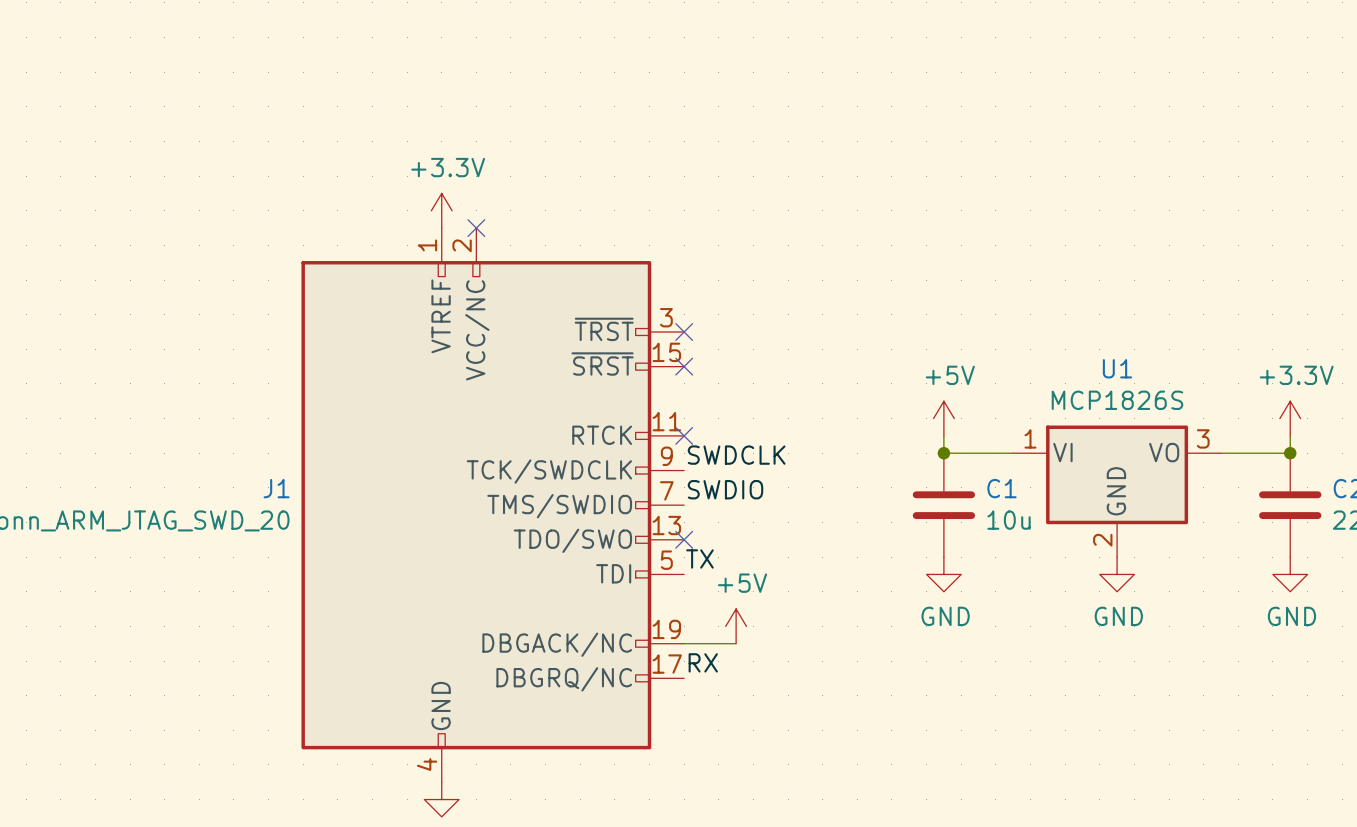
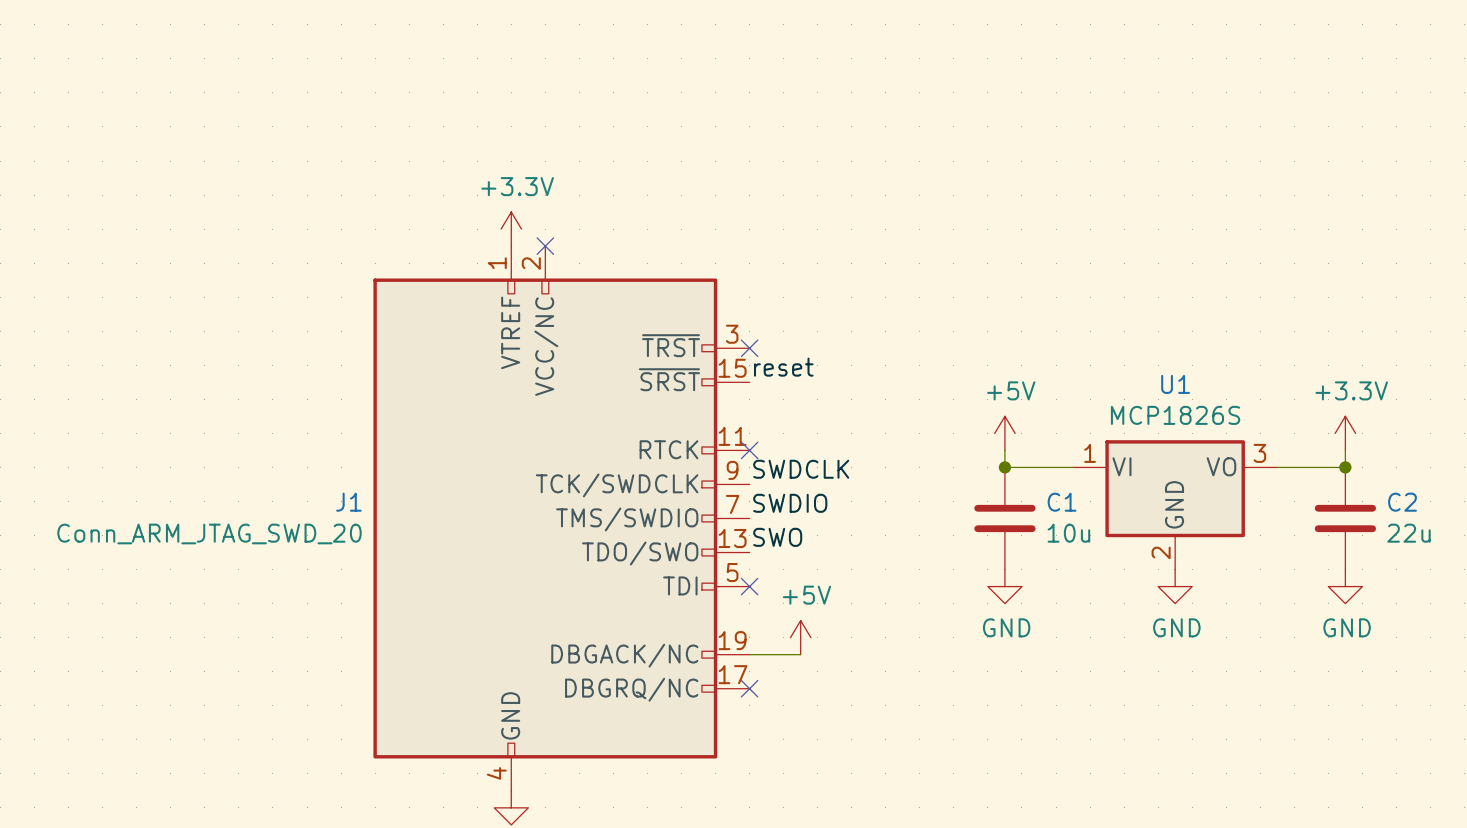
label: none -> reset (783, 367)
no-connect mark: (684, 366) -> none
label: none -> SWO (777, 537)
no-connect mark position: (684, 539) -> (749, 586)
label: TX (699, 558) -> none
label: RX (703, 662) -> none
no-connect mark: none -> (749, 688)

